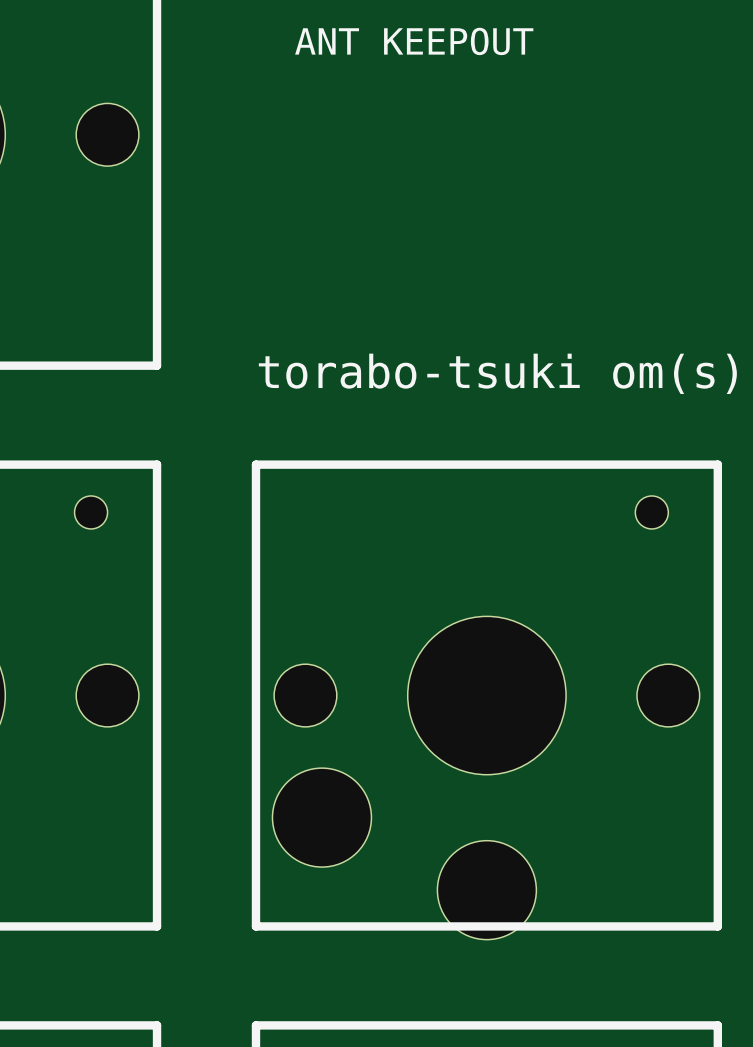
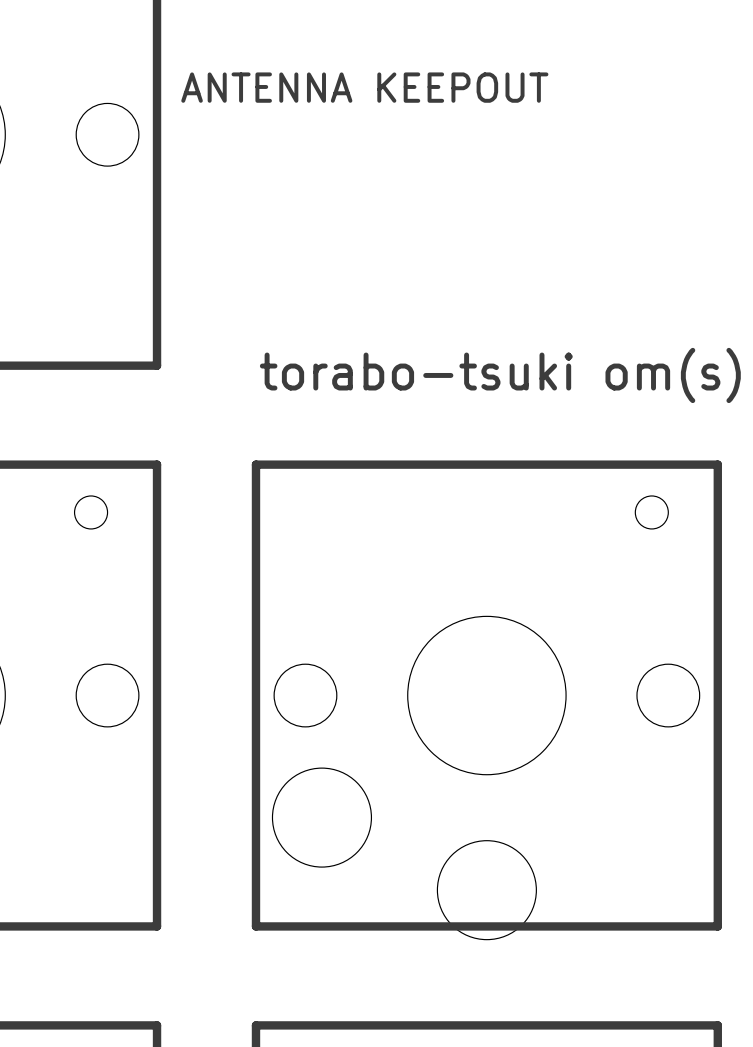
text: ANT KEEPOUT (414, 41) -> ANTENNA KEEPOUT (364, 87)

